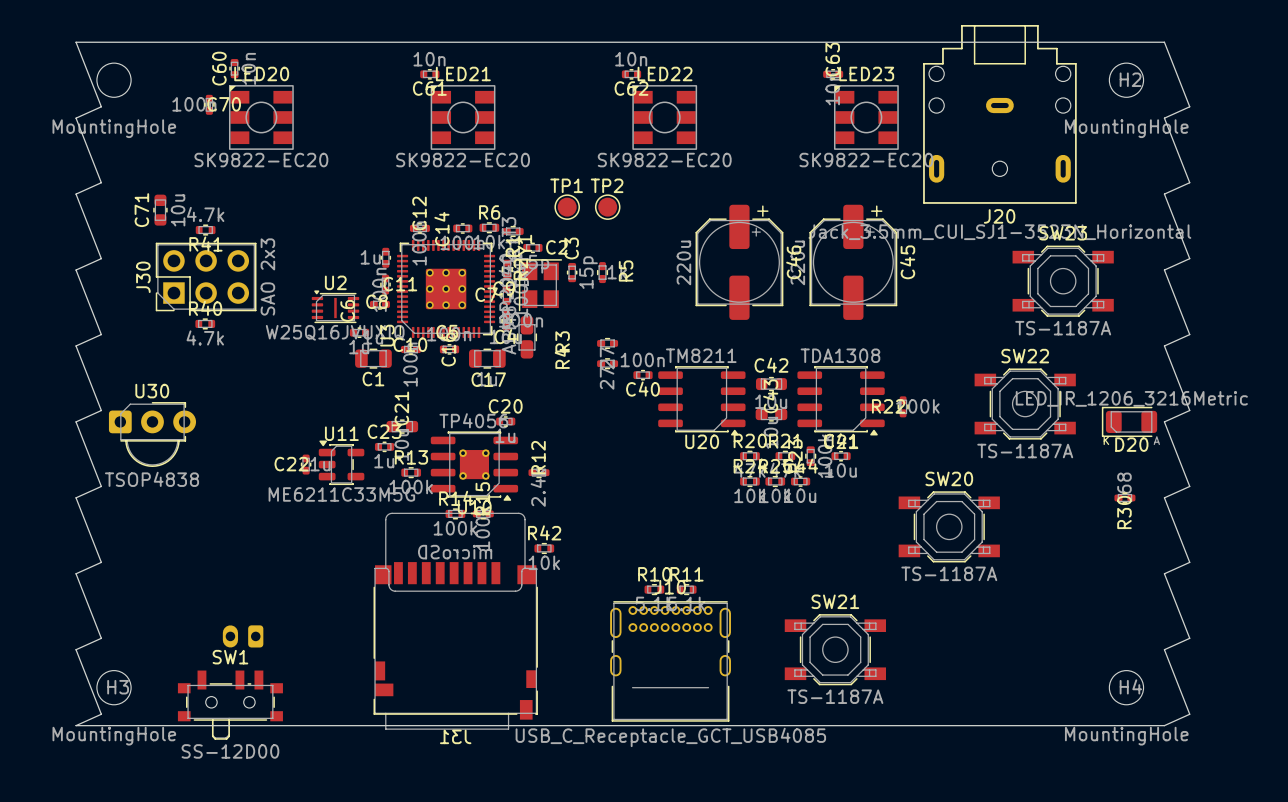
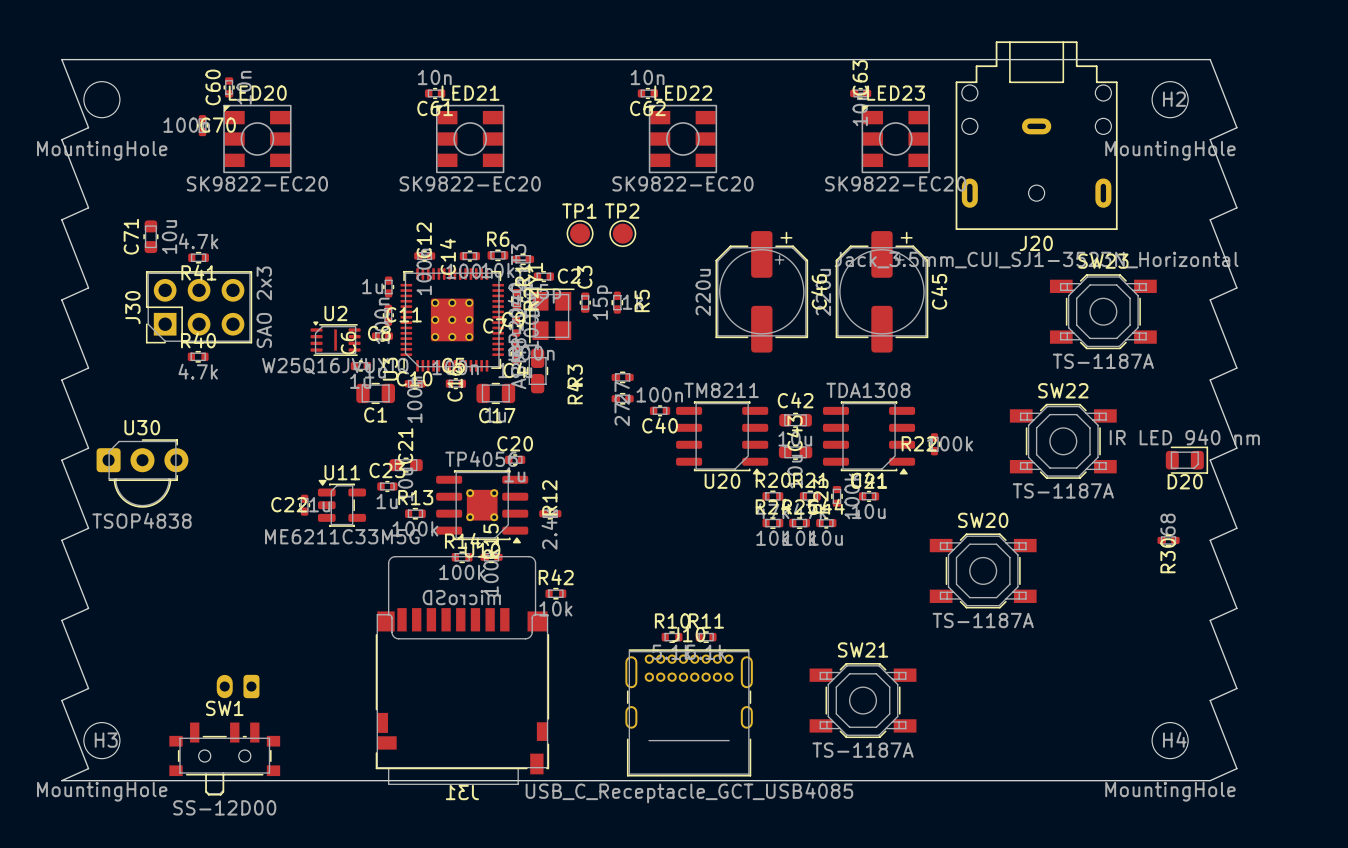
D20 value: LED_IR_1206_3216Metric (1131, 398) -> IR LED 940 nm (1184, 437)
D20 footprint: [1101, 406, 1158, 438] -> [1165, 446, 1209, 474]

